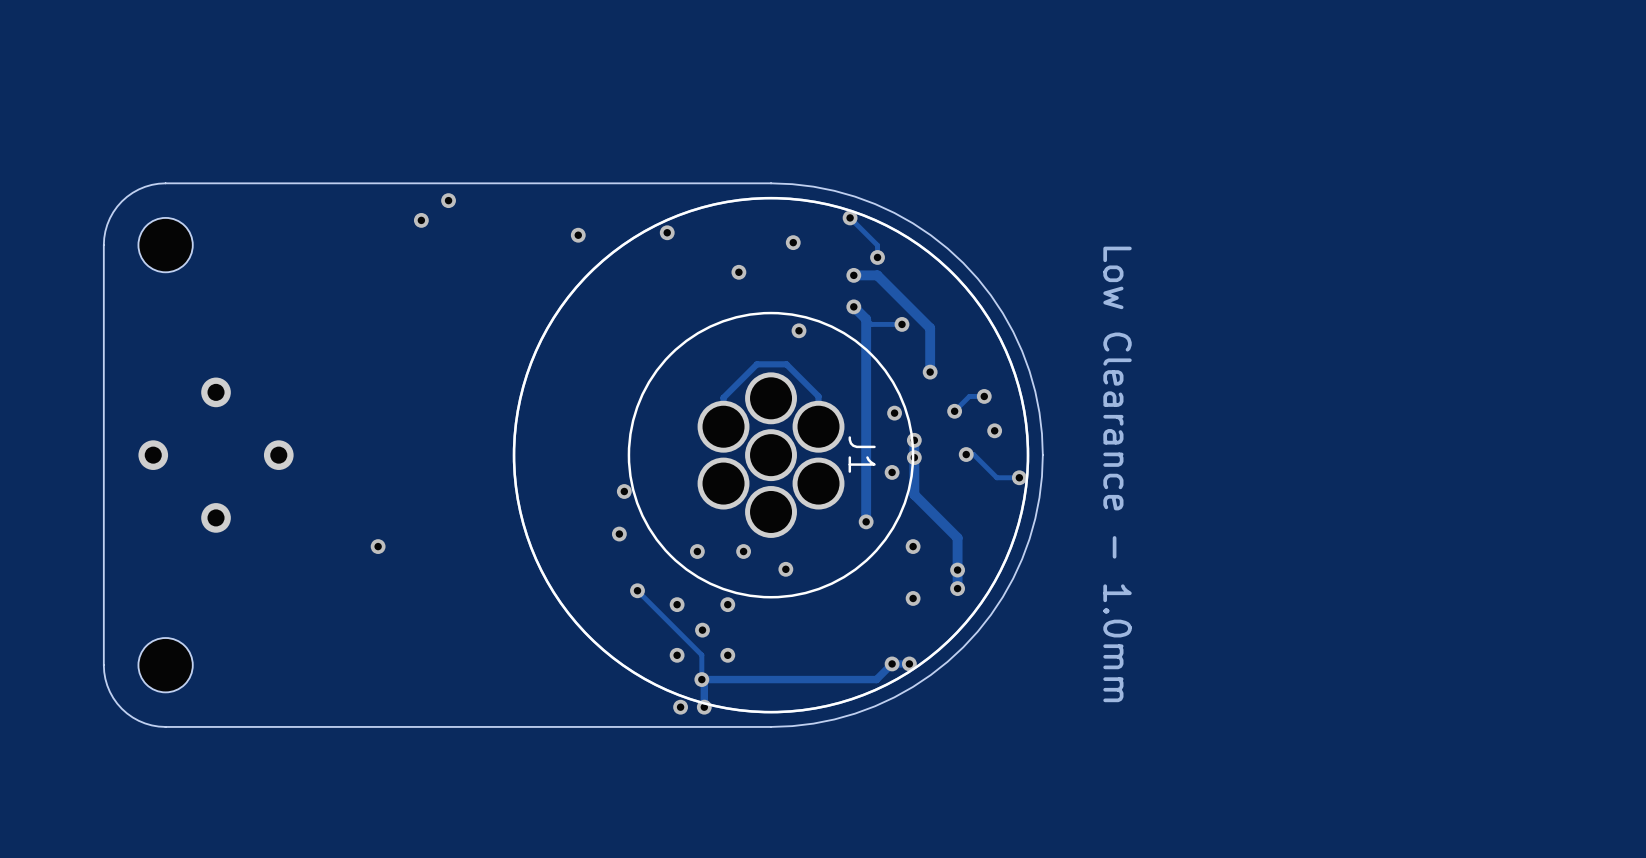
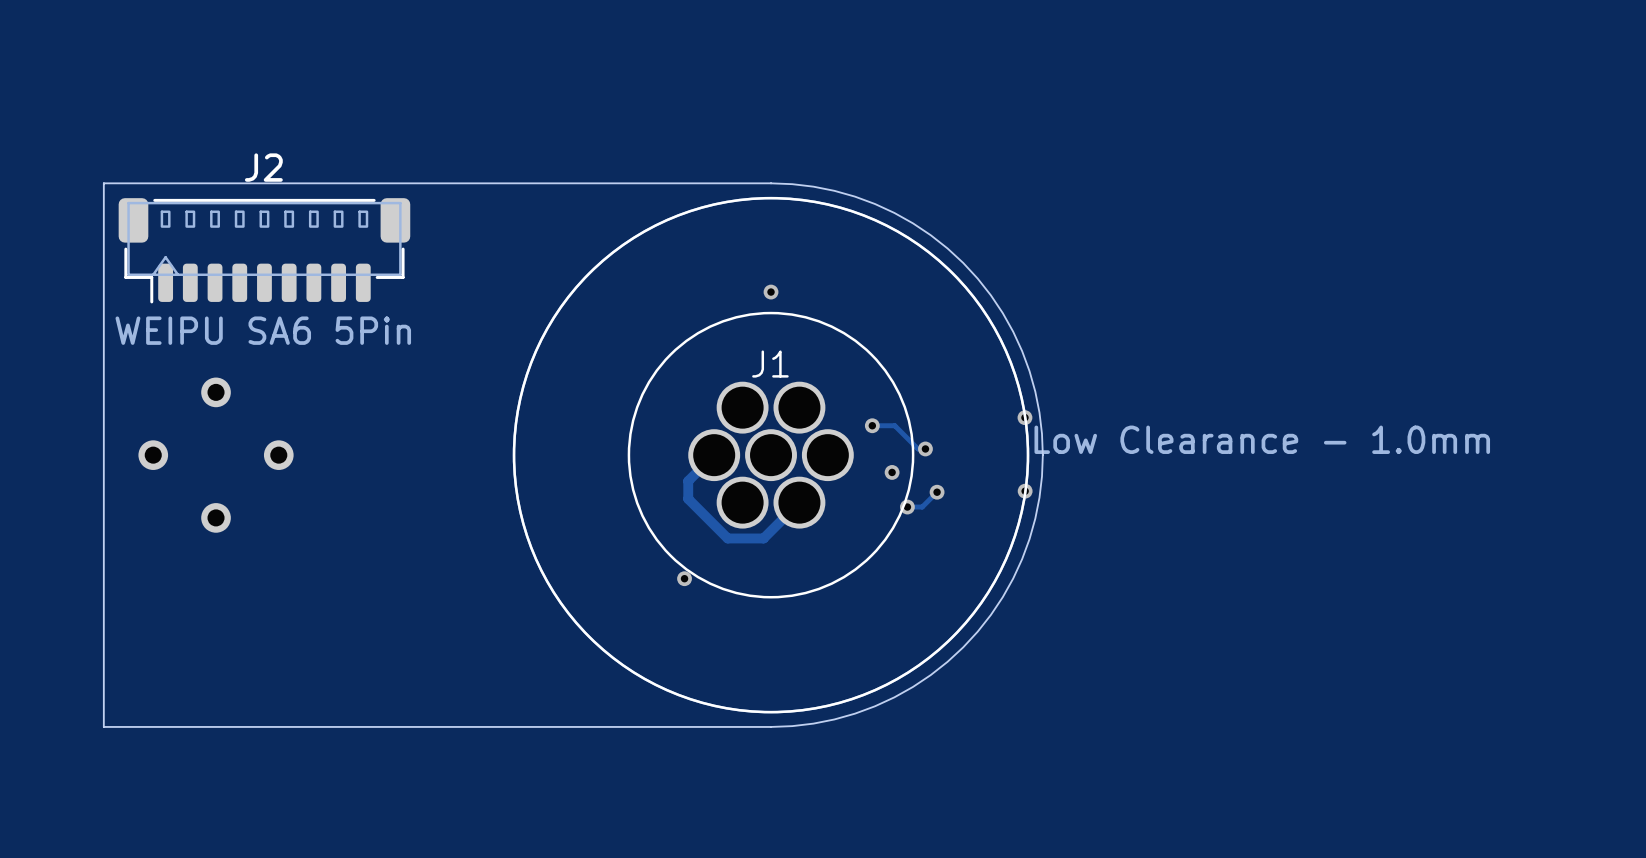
board edge: (165, 183) (151, 184) (138, 189) (121, 201) (109, 218) (105, 231) (103, 245) -> (165, 183) (103, 183) (103, 245)
J1 footprint: [512, 196, 1030, 714] -> [512, 196, 1030, 714]
via: (448, 200) -> none
track: (850, 217) (877, 245) (877, 257) -> none
via: (850, 217) -> none
via: (421, 220) -> none
via: (667, 232) -> none
via: (578, 235) -> none
via: (793, 242) -> none
part: (165, 245) -> none
J2: none -> WEIPU SA6 5Pin (264, 250)
via: (877, 257) -> none
via: (738, 272) -> none
track: (853, 275) (877, 275) (930, 328) (930, 372) -> none
via: (853, 275) -> none
via: none -> (771, 292)
via: (853, 306) -> none
track: (901, 324) (871, 324) (853, 306) (866, 319) (866, 521) -> none
via: (901, 324) -> none
via: (799, 330) -> none
via: (930, 372) -> none
track: (984, 396) (969, 396) (954, 411) -> none
via: (984, 396) -> none
via: (954, 411) -> none
via: (894, 413) -> none
via: none -> (1024, 417)
track: none -> (872, 425) (894, 425) (918, 448) (925, 448)
via: none -> (872, 425)
track: (818, 426) (818, 396) (786, 364) (756, 364) (723, 397) (723, 426) -> none
via: (994, 430) -> none
track: (914, 440) (914, 494) (957, 537) (957, 588) -> none
via: (914, 440) -> none
via: none -> (925, 448)
J1 name position: J1 (862, 454) -> J1 (770, 364)
track: (966, 454) (973, 454) (996, 477) (1019, 477) -> none
via: (966, 454) -> none
track: none -> (714, 455) (688, 481) (688, 498) (727, 538) (763, 538) (799, 502)
via: (914, 457) -> none
via position: (1019, 477) -> (1025, 491)
via: (624, 491) -> none
track: none -> (937, 492) (922, 507) (907, 507)
via: none -> (937, 492)
via: none -> (907, 507)
via: (866, 521) -> none
via: (619, 534) -> none
via: (378, 546) -> none
via: (913, 546) -> none
via: (697, 551) -> none
via: (743, 551) -> none
via: (785, 569) -> none
via: (957, 570) -> none
via: none -> (684, 578)
via: (957, 588) -> none
via: (637, 590) -> none
track: (640, 590) (637, 590) (701, 655) (701, 679) -> none
via: (913, 598) -> none
via: (677, 604) -> none
via: (727, 604) -> none
via: (702, 630) -> none
via: (677, 655) -> none
via: (727, 655) -> none
via: (892, 663) -> none
track: (909, 663) (892, 663) (876, 679) (701, 679) -> none
via: (909, 663) -> none
board edge: (103, 665) (107, 685) (113, 698) (121, 708) (138, 720) (151, 725) (165, 726) -> (103, 665) (103, 726) (165, 726)
part: (165, 665) -> none
track: (701, 679) (704, 682) (704, 707) -> none
via: (701, 679) -> none
via: (680, 707) -> none
via: (704, 707) -> none

